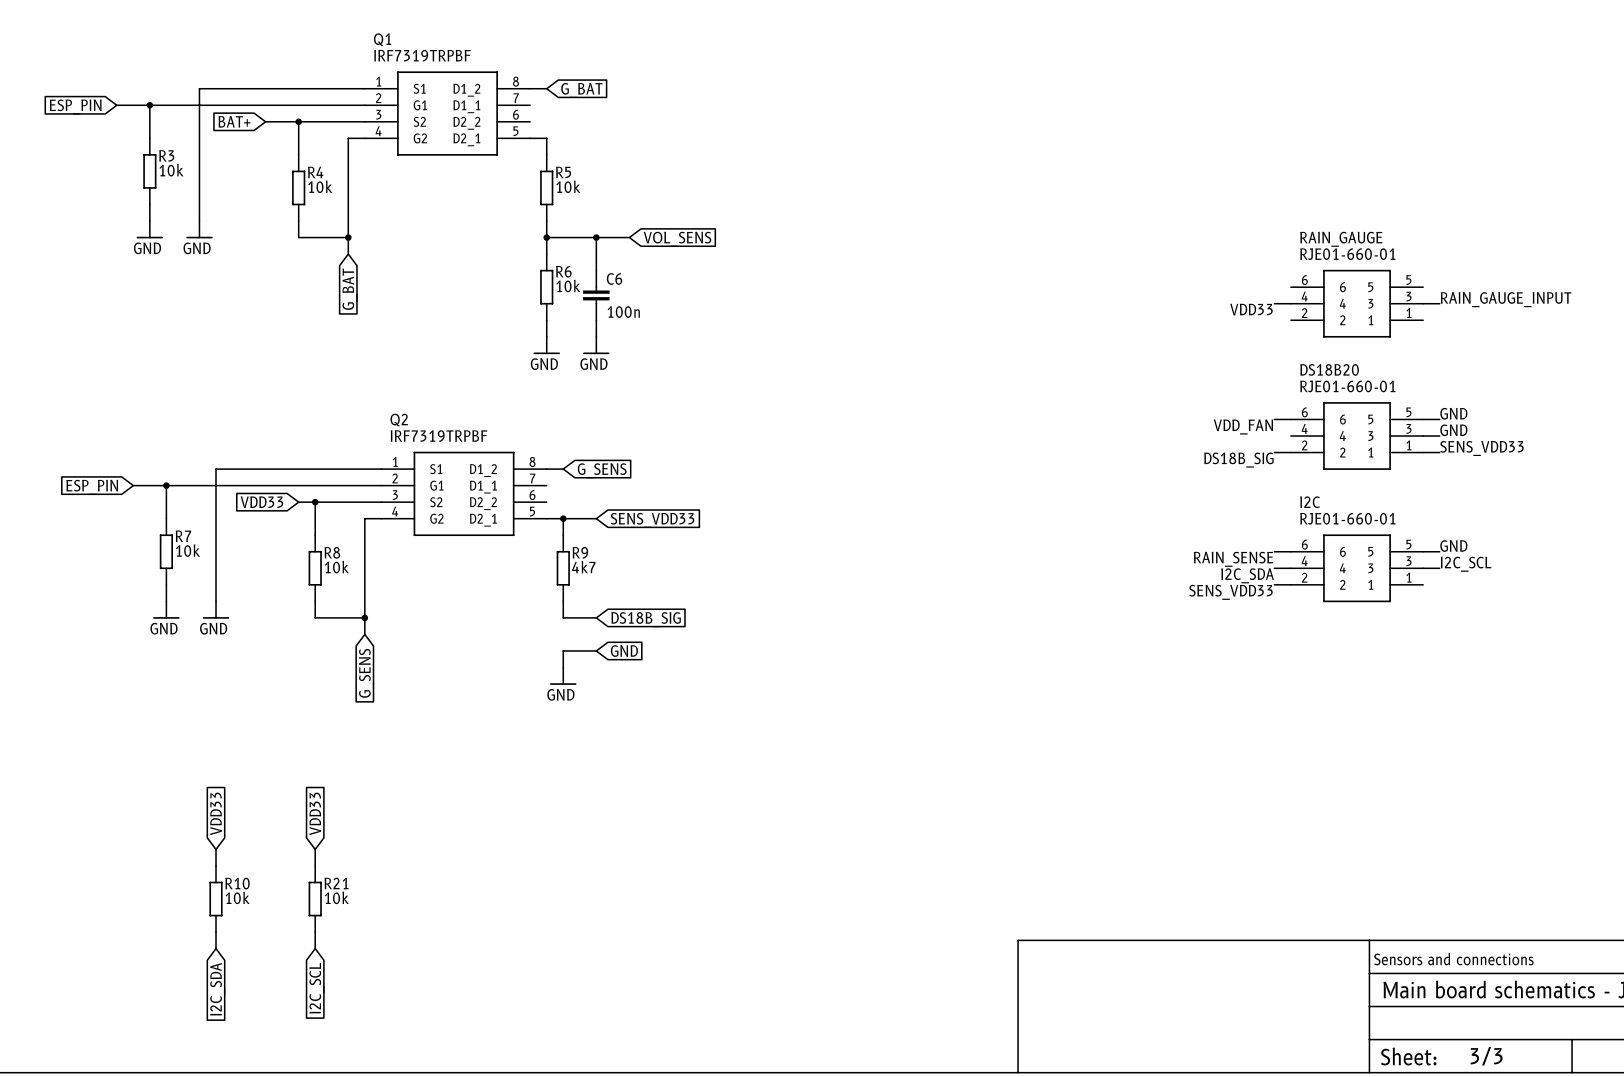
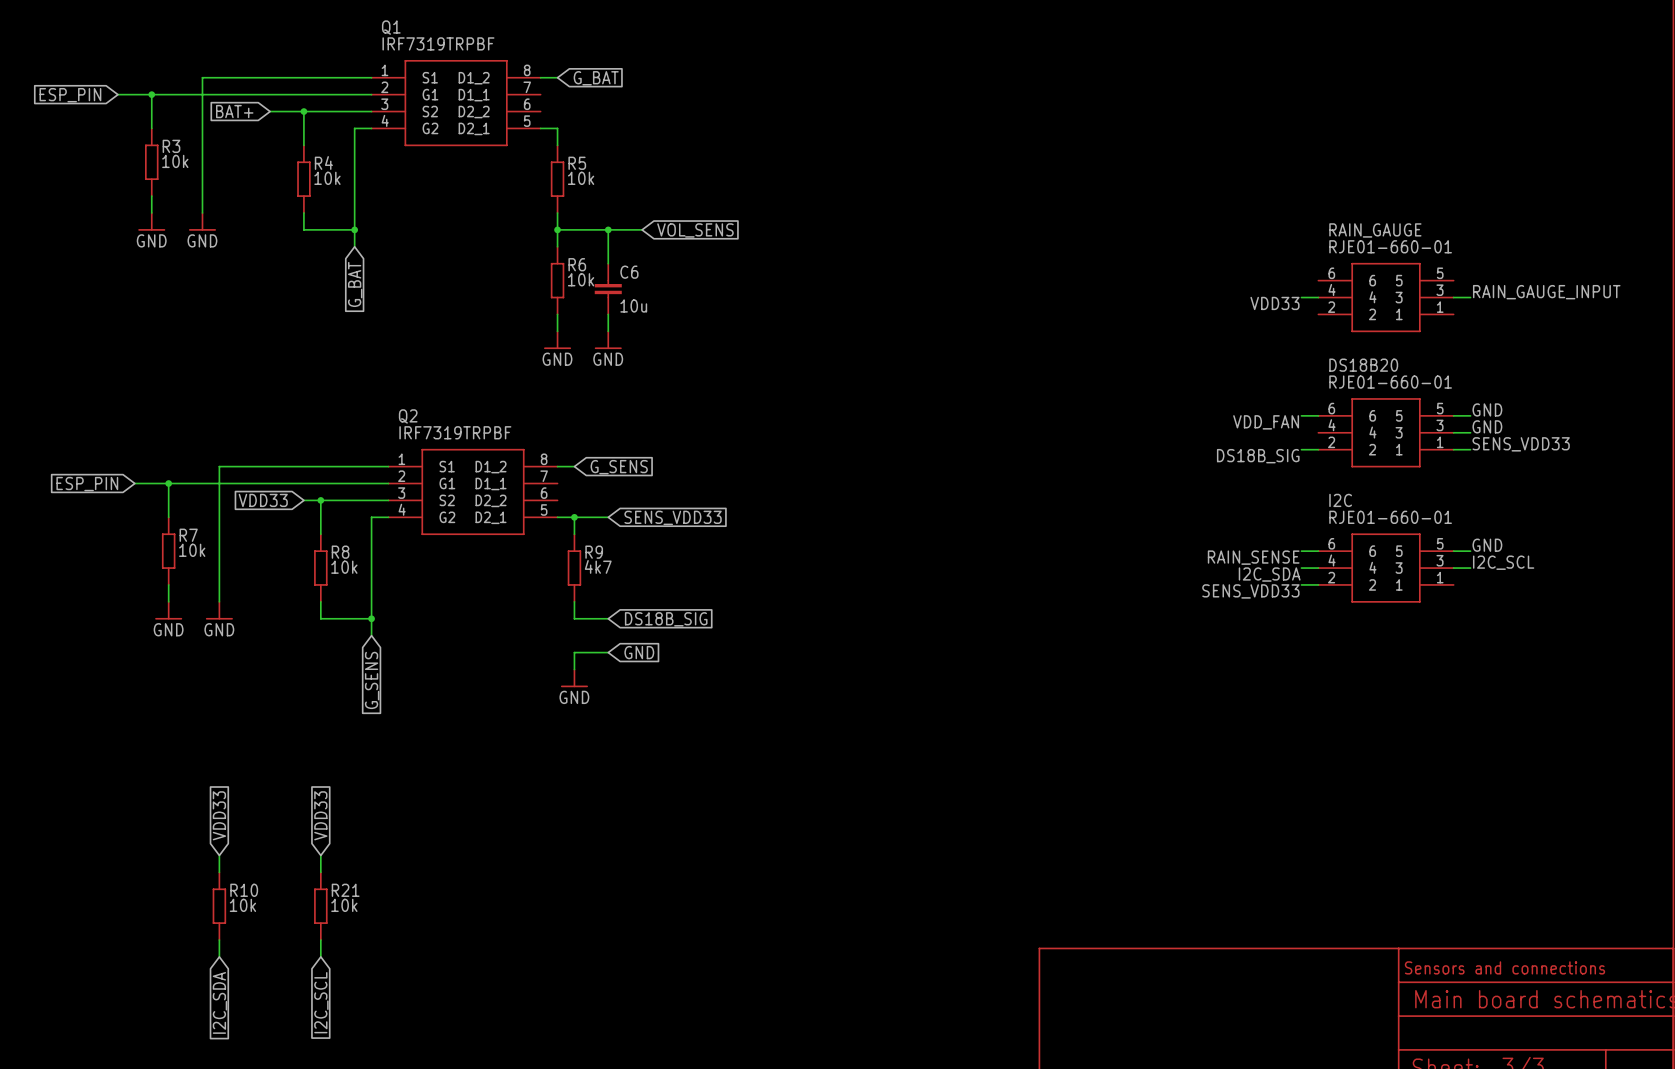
C6 value: 100n (623, 312) -> 10u (633, 305)

